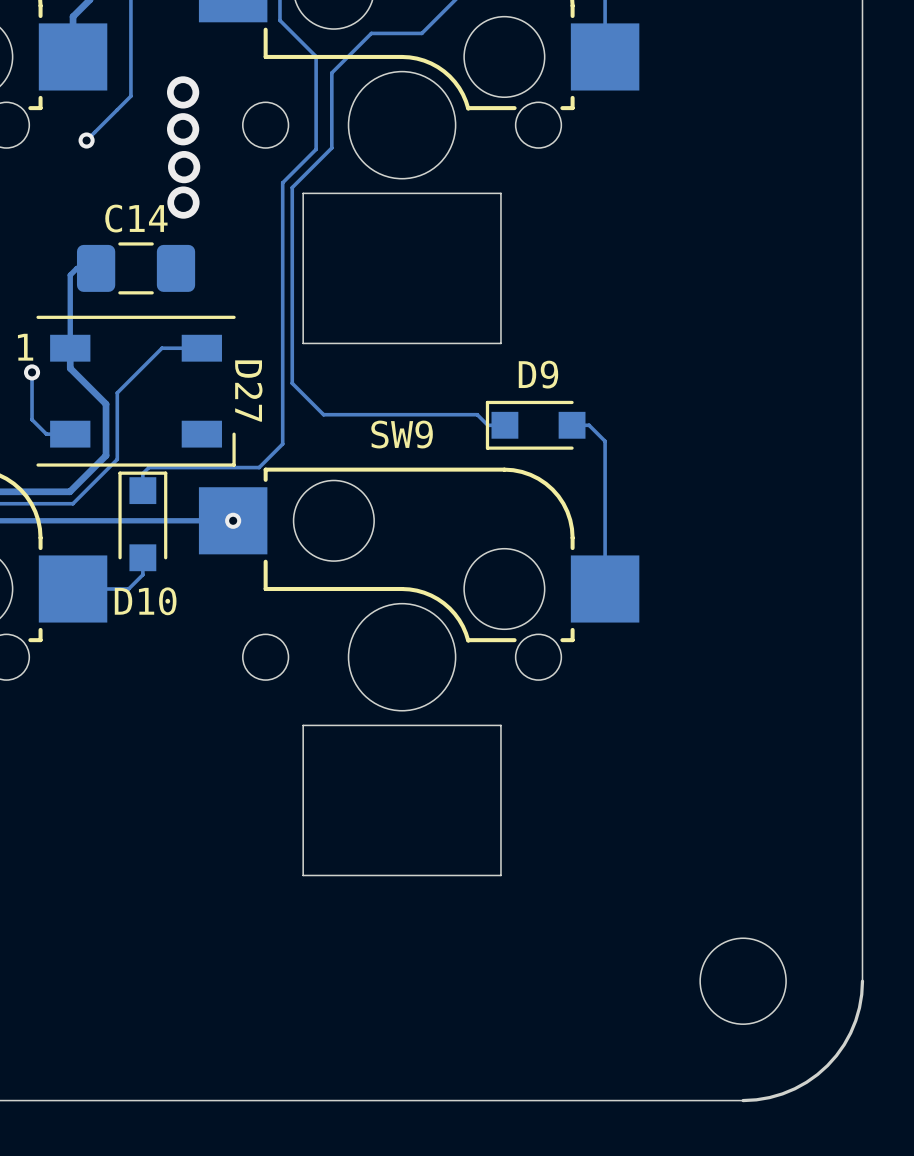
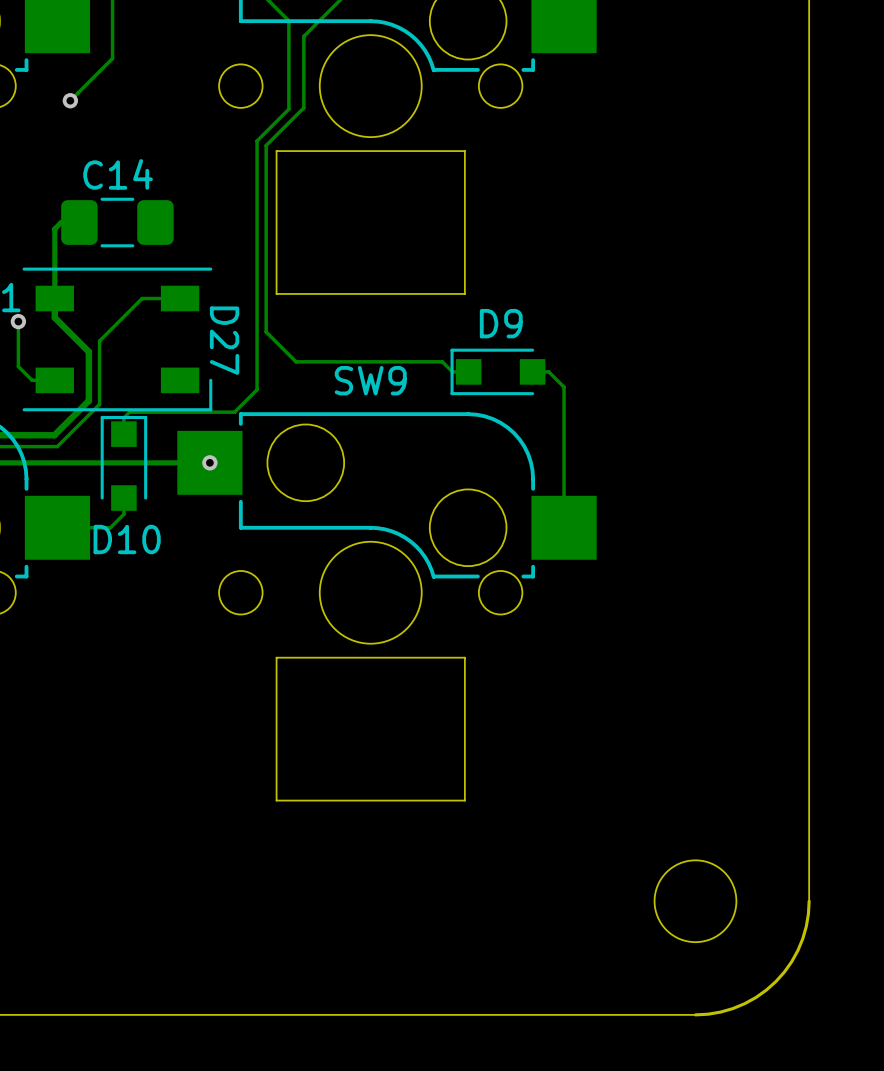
via: (183, 92) -> none
via: (183, 129) -> none
via: (184, 167) -> none
via: (183, 202) -> none

